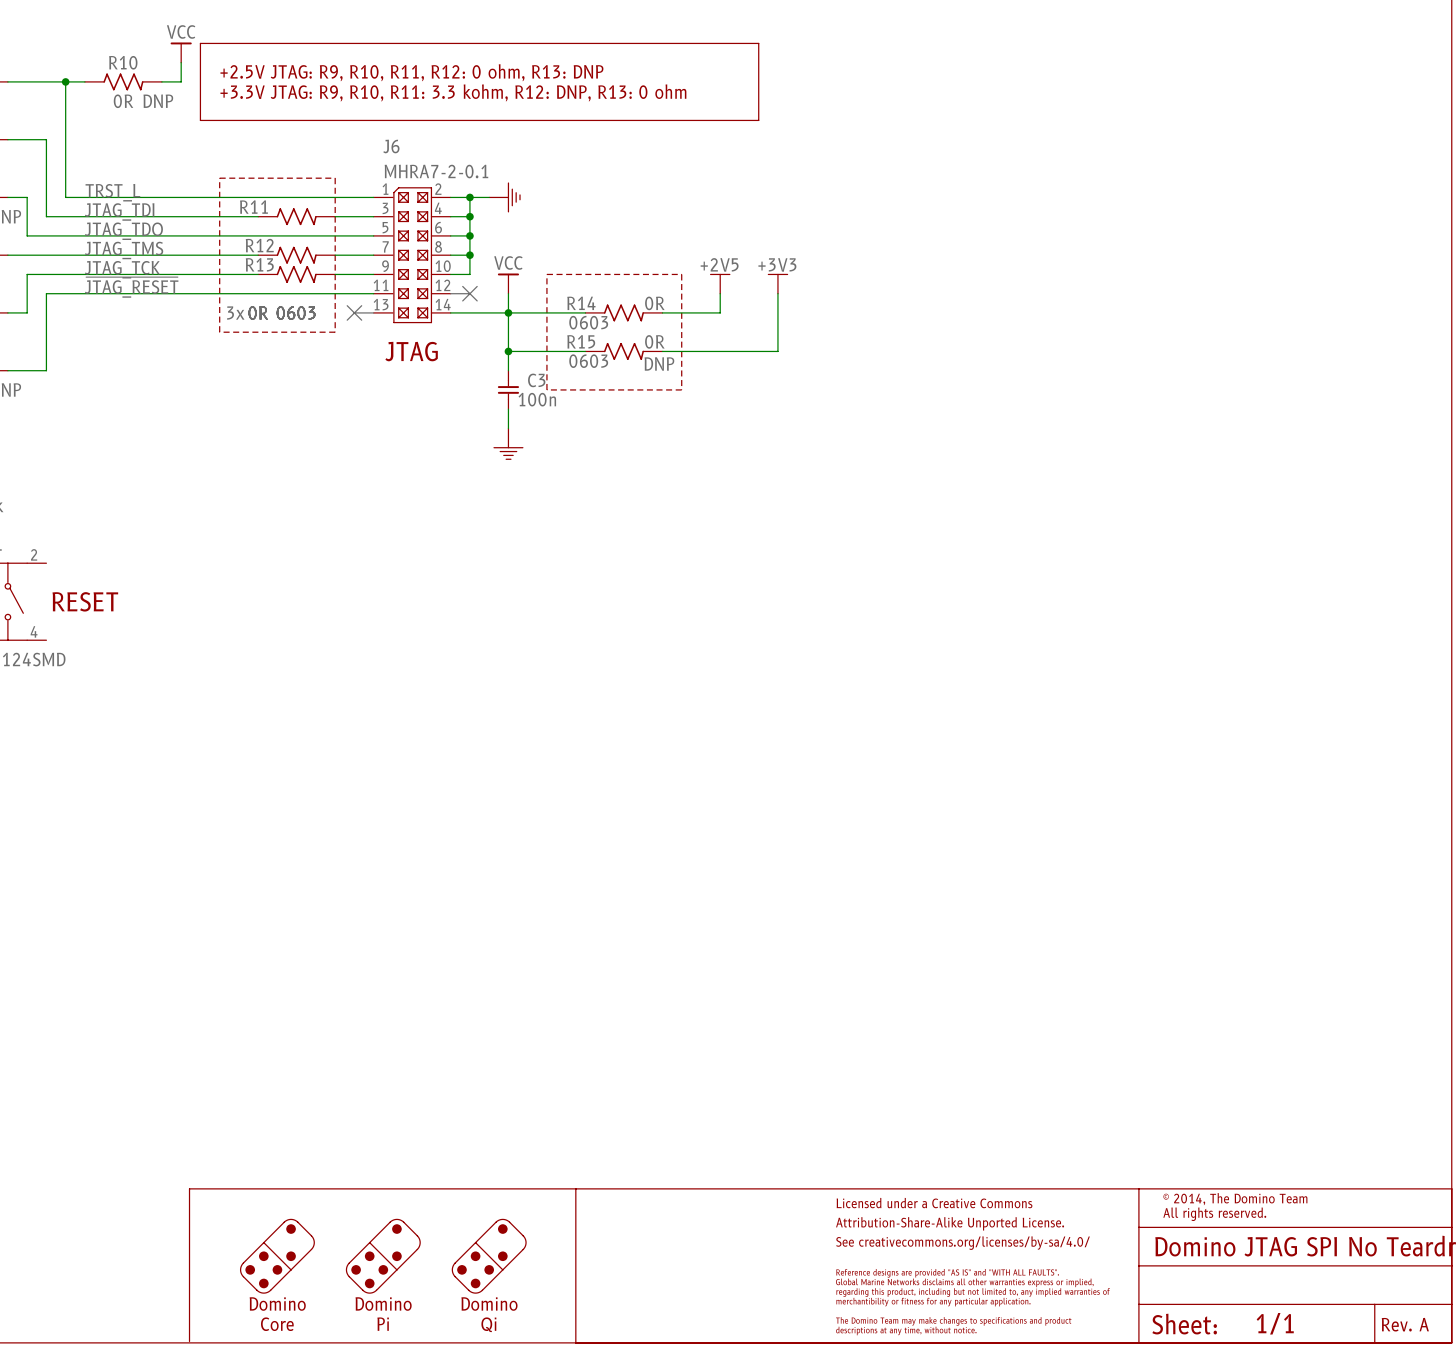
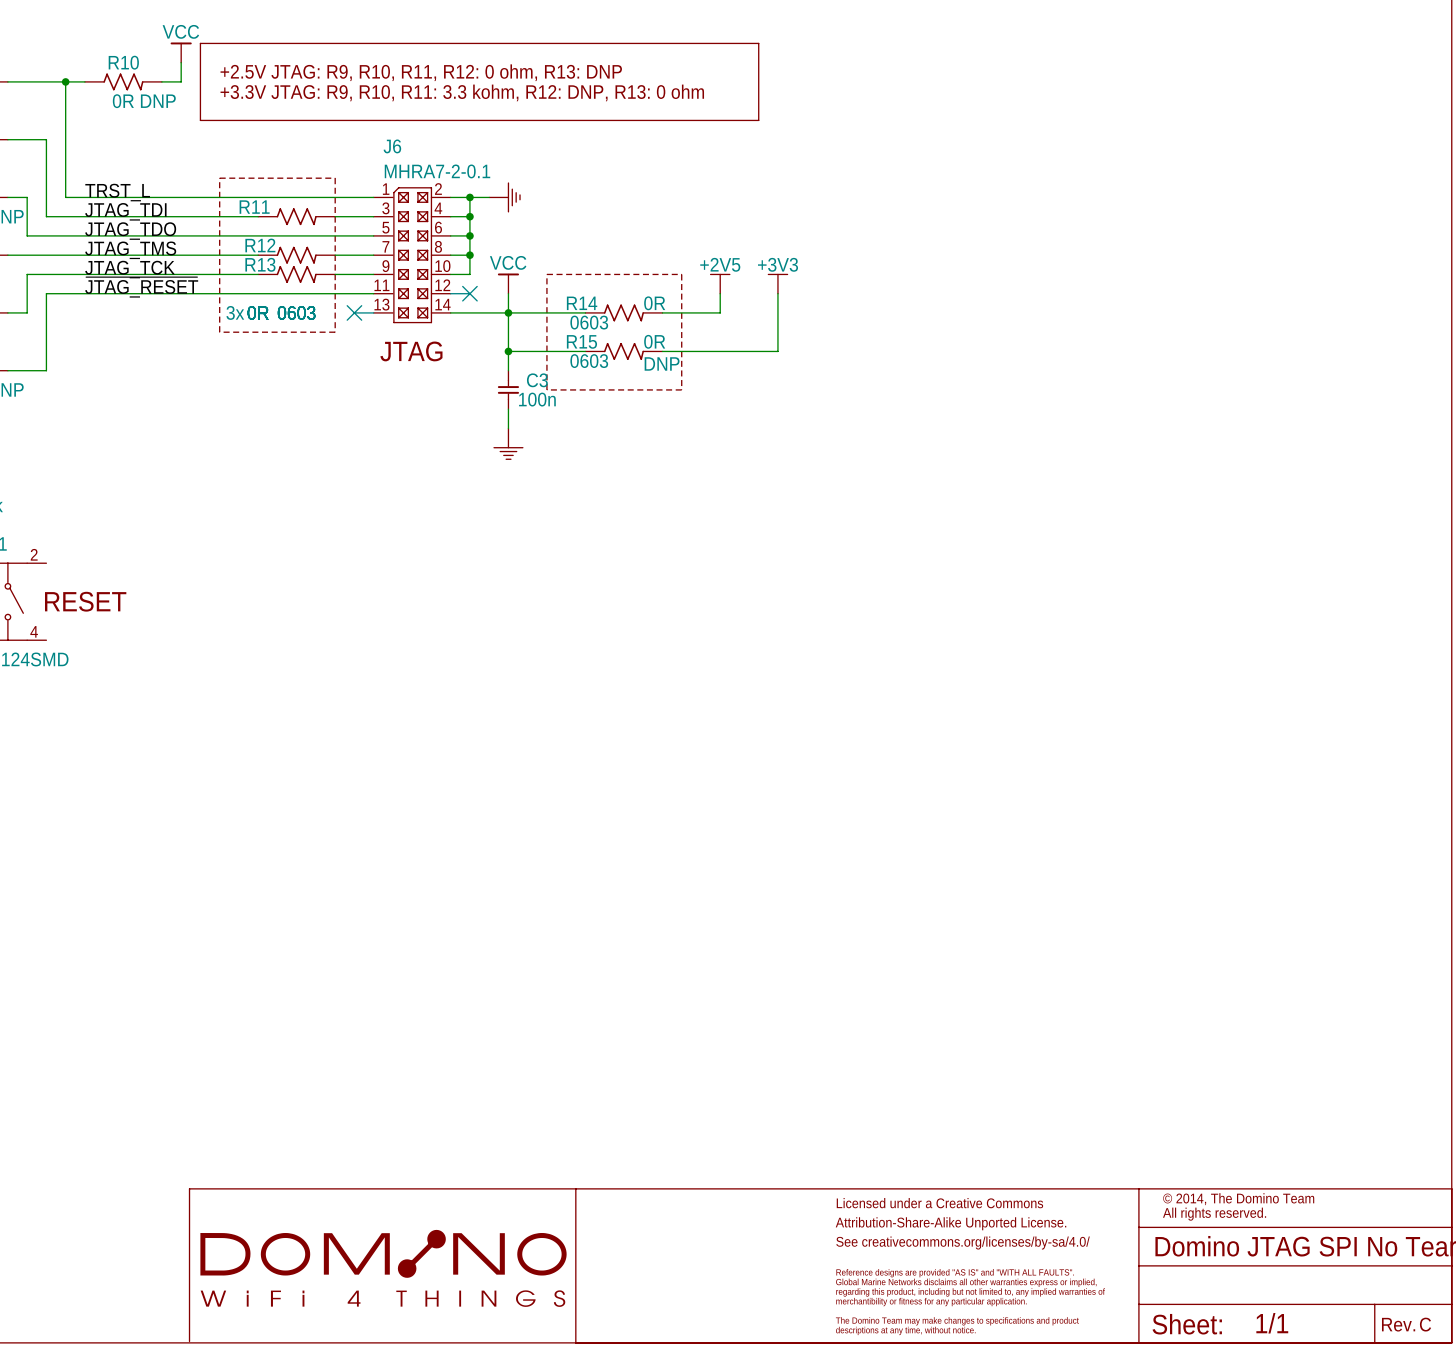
line: (284, 1222) (240, 1267) (242, 1275) (261, 1292) (270, 1290) (313, 1245) (312, 1236) (296, 1221) (291, 1219) (284, 1222) -> none
drawing: [286, 1224, 296, 1234] -> none
drawing: [392, 1224, 402, 1234] -> none
drawing: [498, 1224, 508, 1234] -> none
line: (263, 1242) (291, 1269) -> none
line: (369, 1242) (396, 1269) -> none
line: (475, 1242) (502, 1269) -> none
drawing: [245, 1251, 296, 1289] -> none
drawing: [351, 1251, 402, 1289] -> none
drawing: [457, 1251, 508, 1289] -> none
part: none -> (383, 1268)
line: (396, 1269) (418, 1248) (420, 1242) (418, 1236) (403, 1222) (396, 1219) (390, 1222) (349, 1263) (346, 1269) (348, 1275) (362, 1290) (369, 1293) (375, 1291) (396, 1269) -> none
line: (502, 1269) (524, 1248) (526, 1242) (524, 1236) (509, 1222) (502, 1219) (496, 1222) (455, 1263) (452, 1269) (454, 1275) (468, 1290) (475, 1293) (481, 1291) (502, 1269) -> none
text: Domino (277, 1304) -> none
text: Domino (383, 1304) -> none
text: Domino (489, 1304) -> none
text: Core (277, 1324) -> none
text: Pi (383, 1324) -> none
text: Qi (488, 1324) -> none
text: A (1424, 1324) -> C (1425, 1324)

